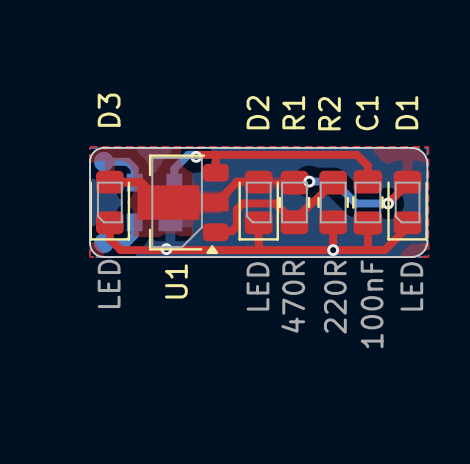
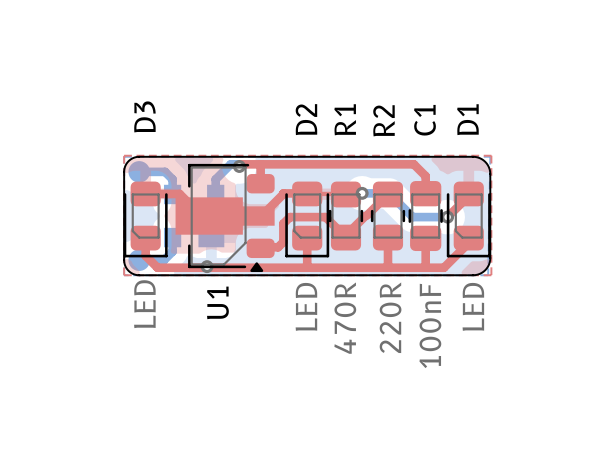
via: (333, 250) -> none

